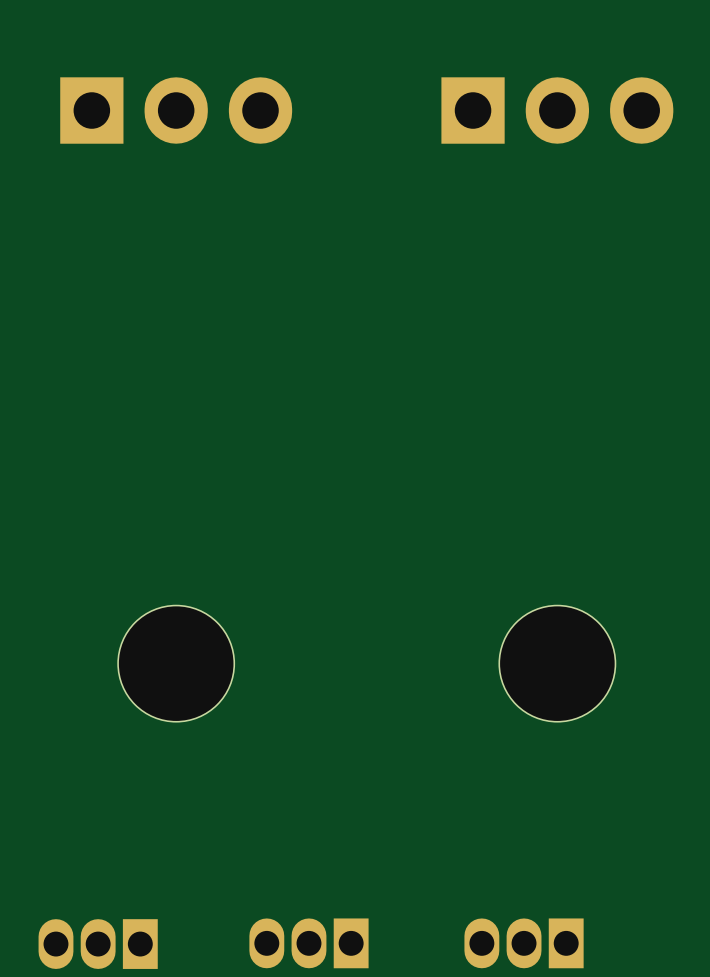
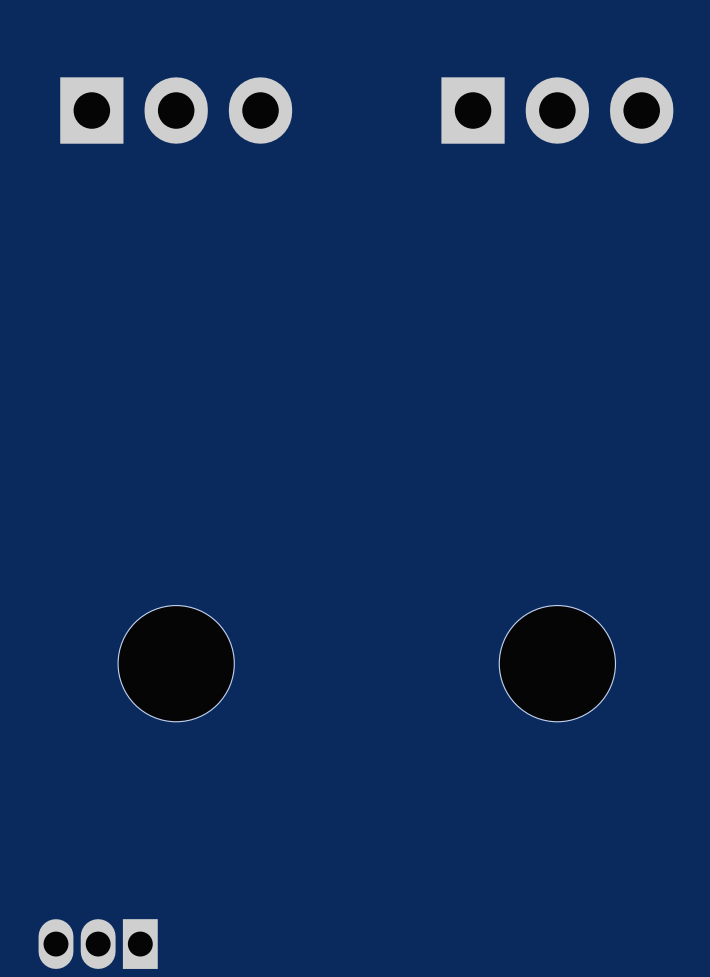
part: (308, 943) -> none
part: (524, 943) -> none

